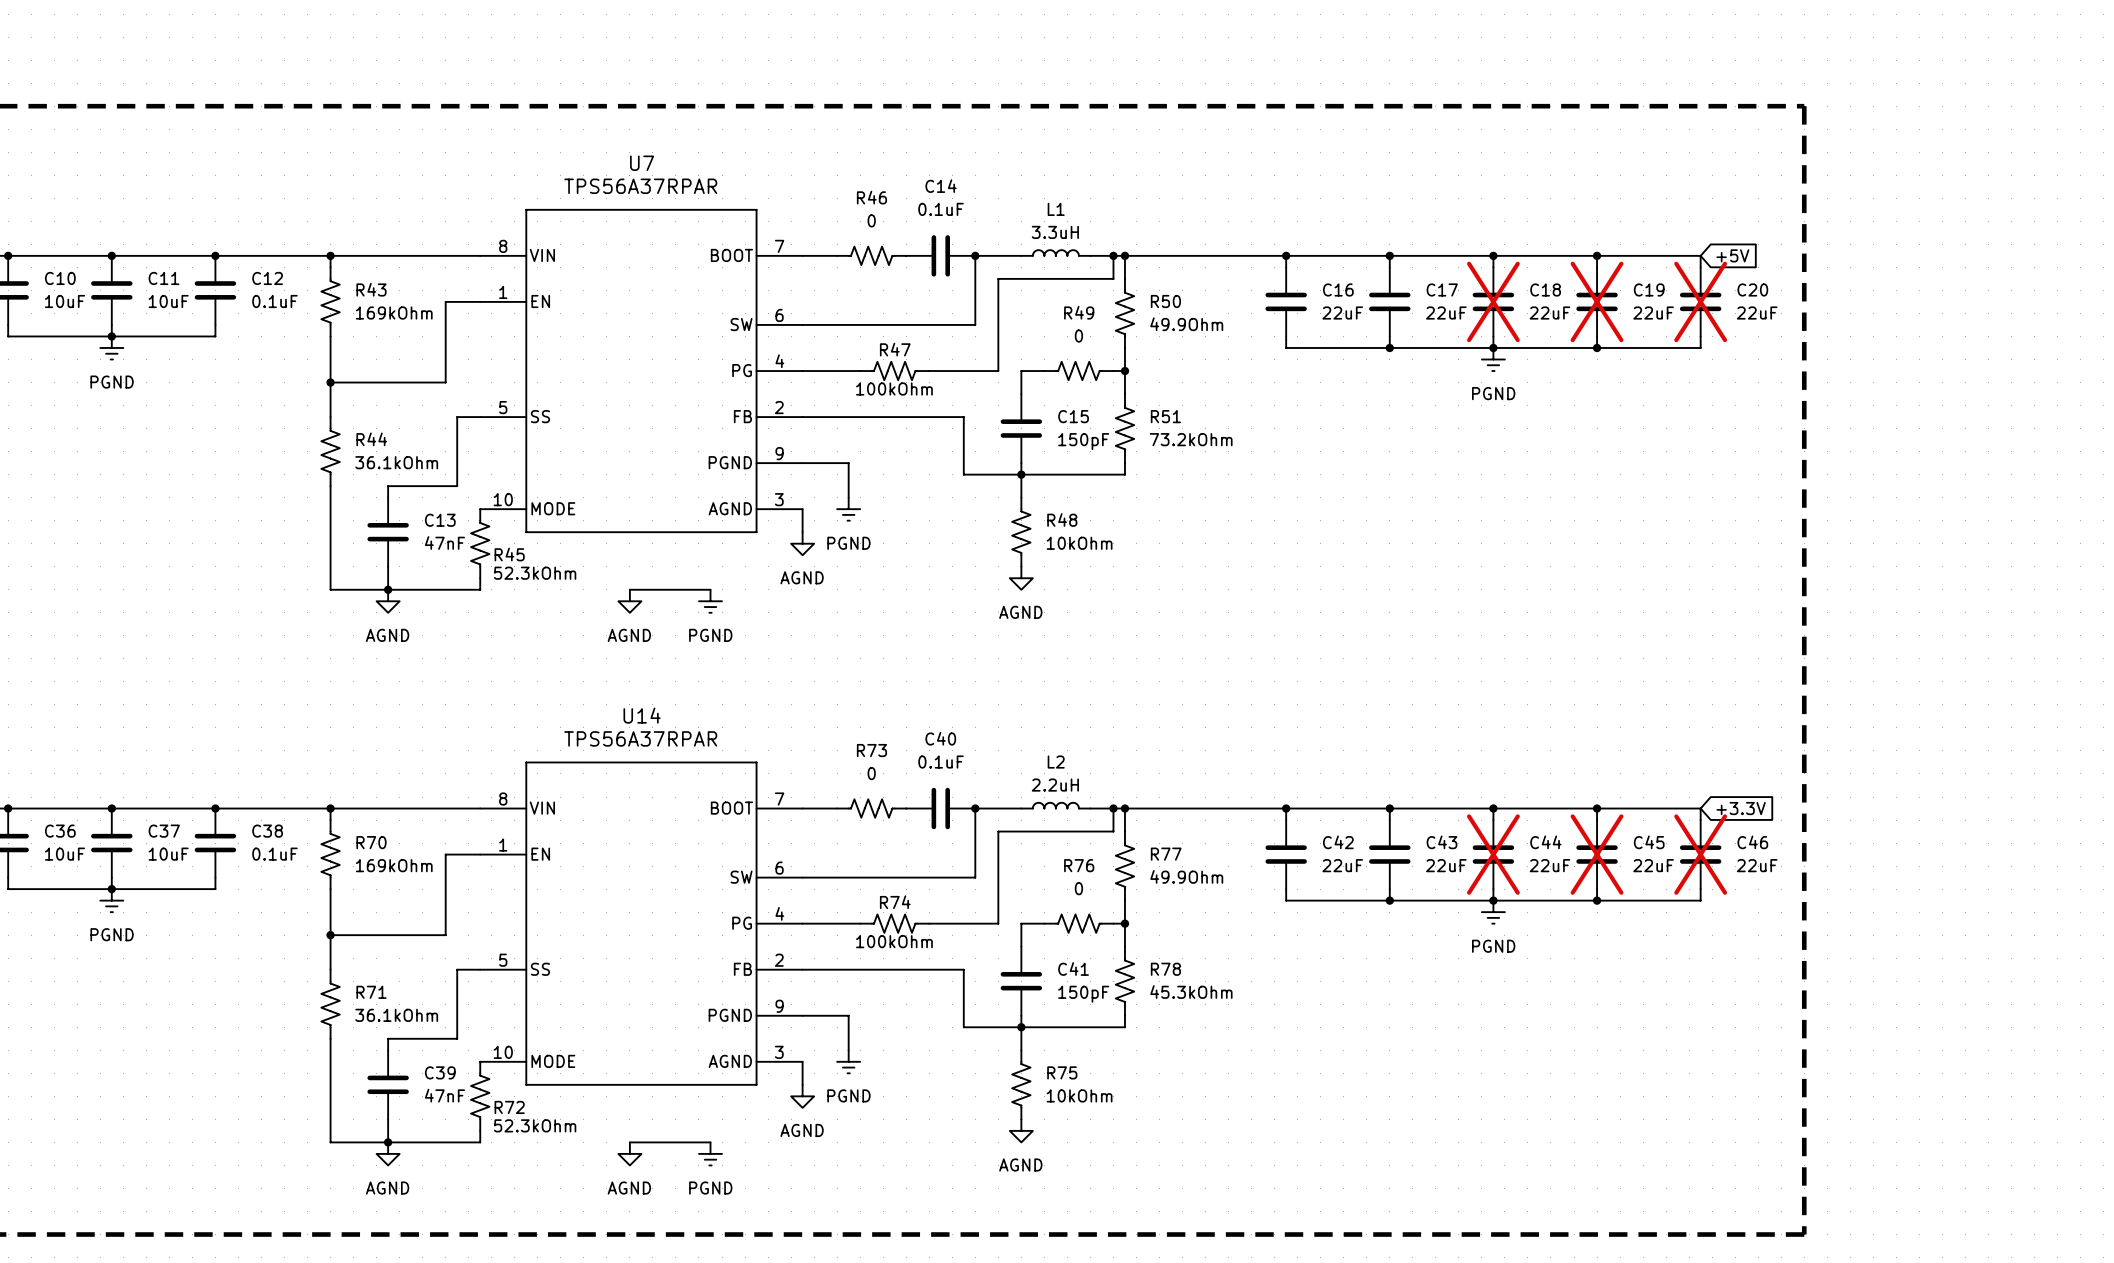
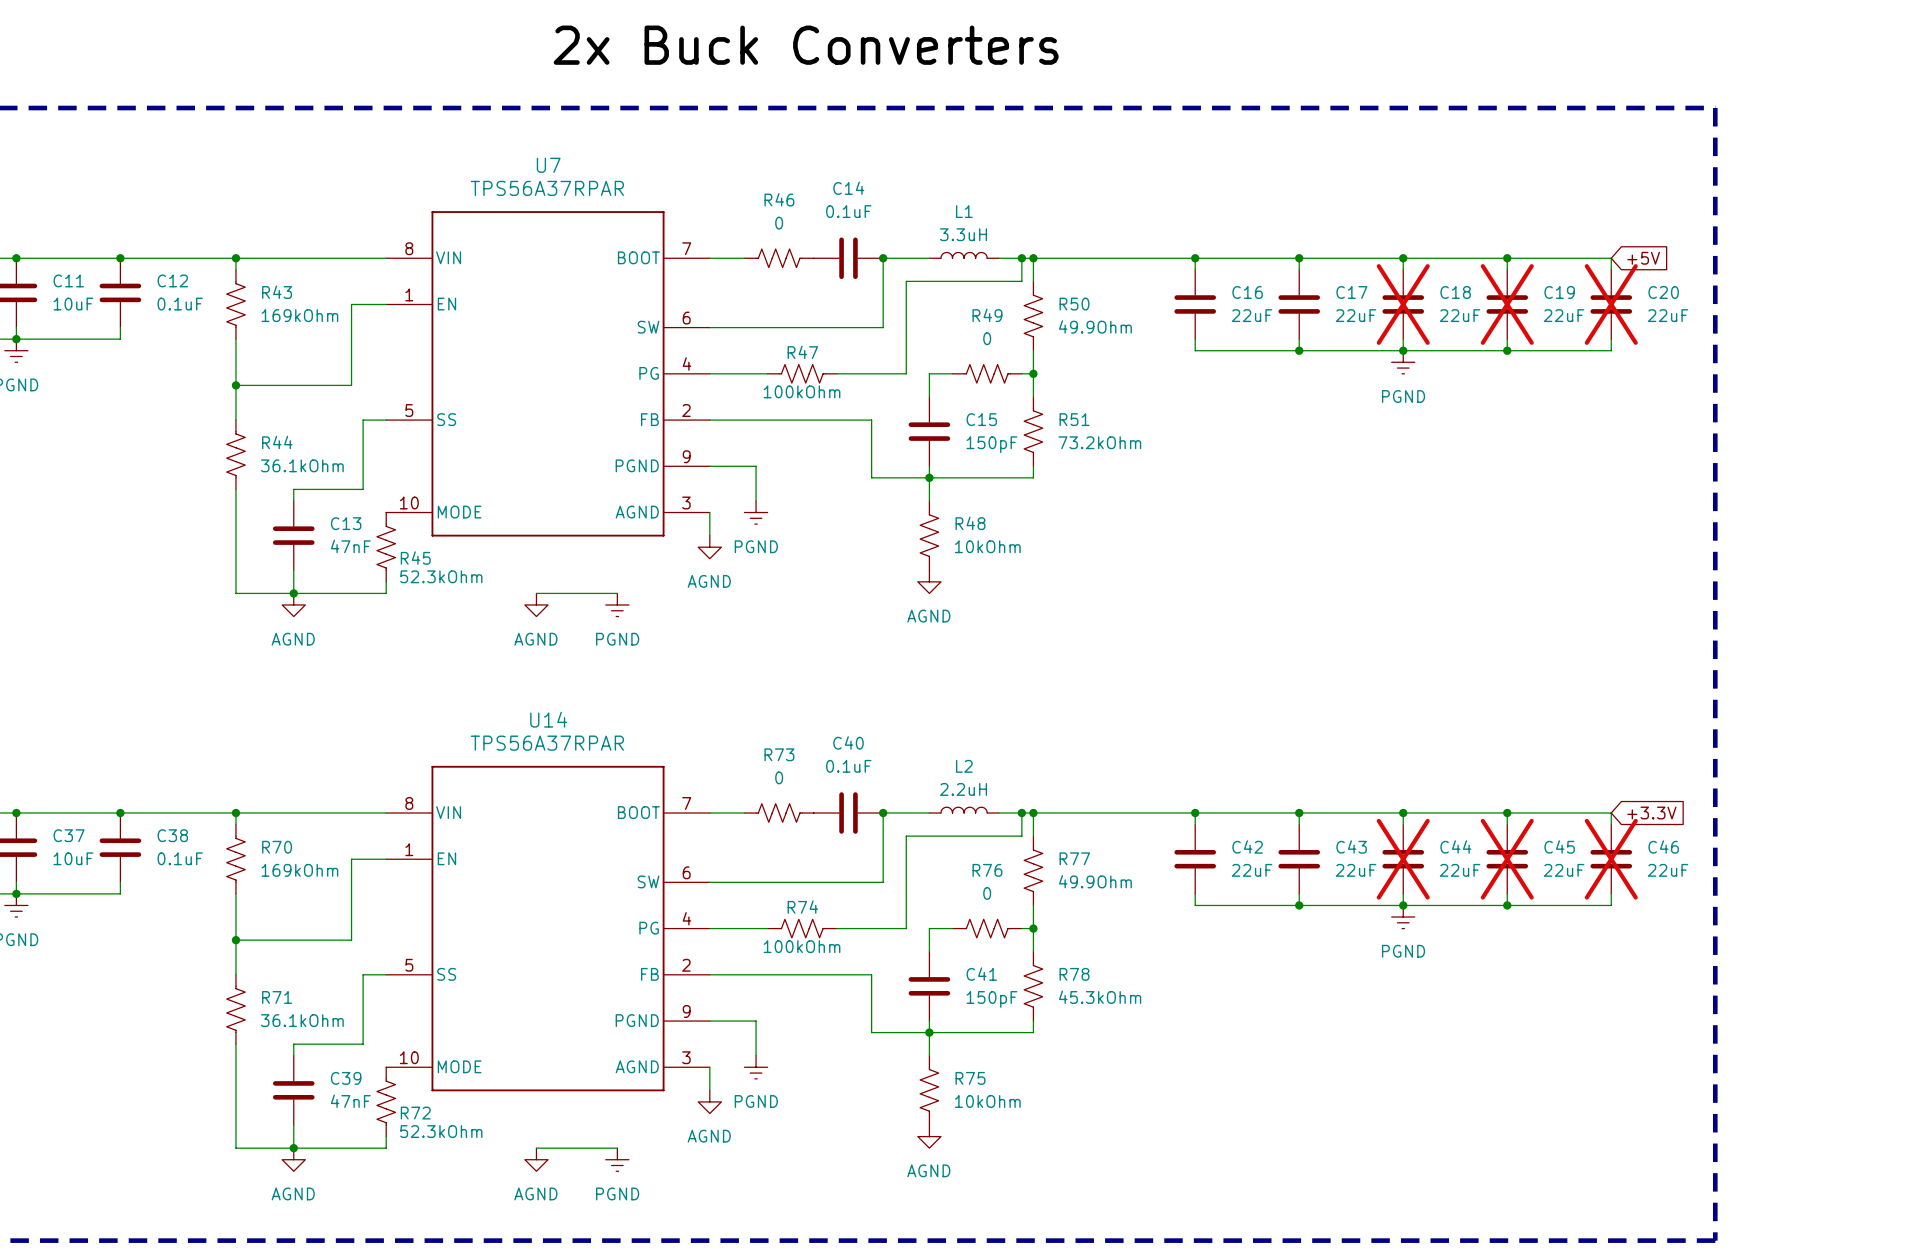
label: none -> 2x Buck Converters (806, 45)

